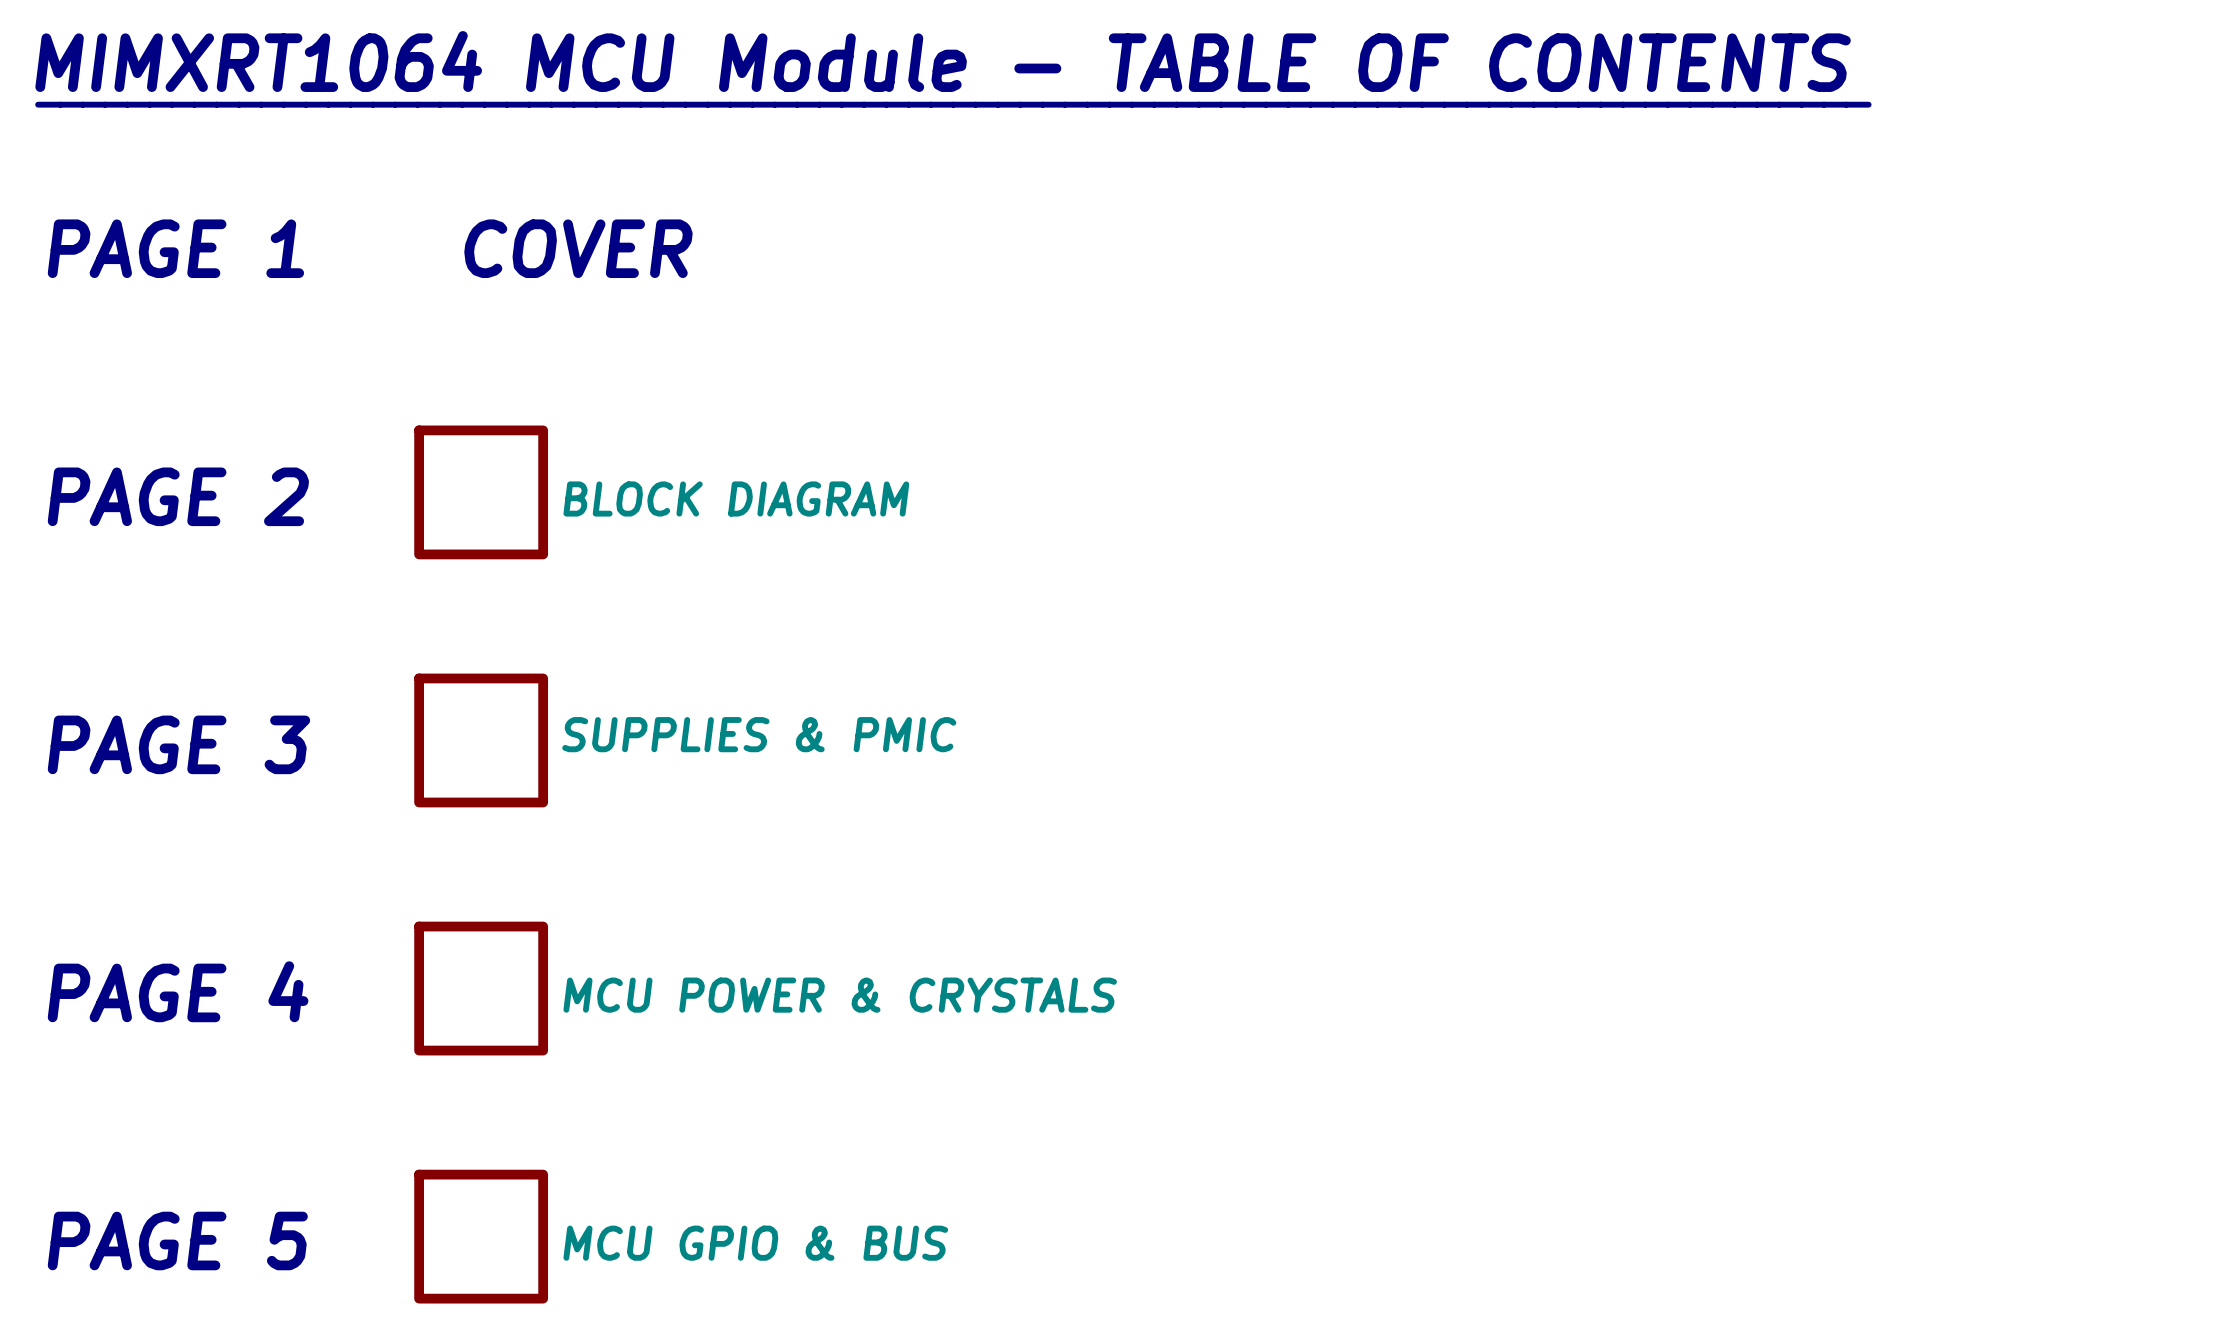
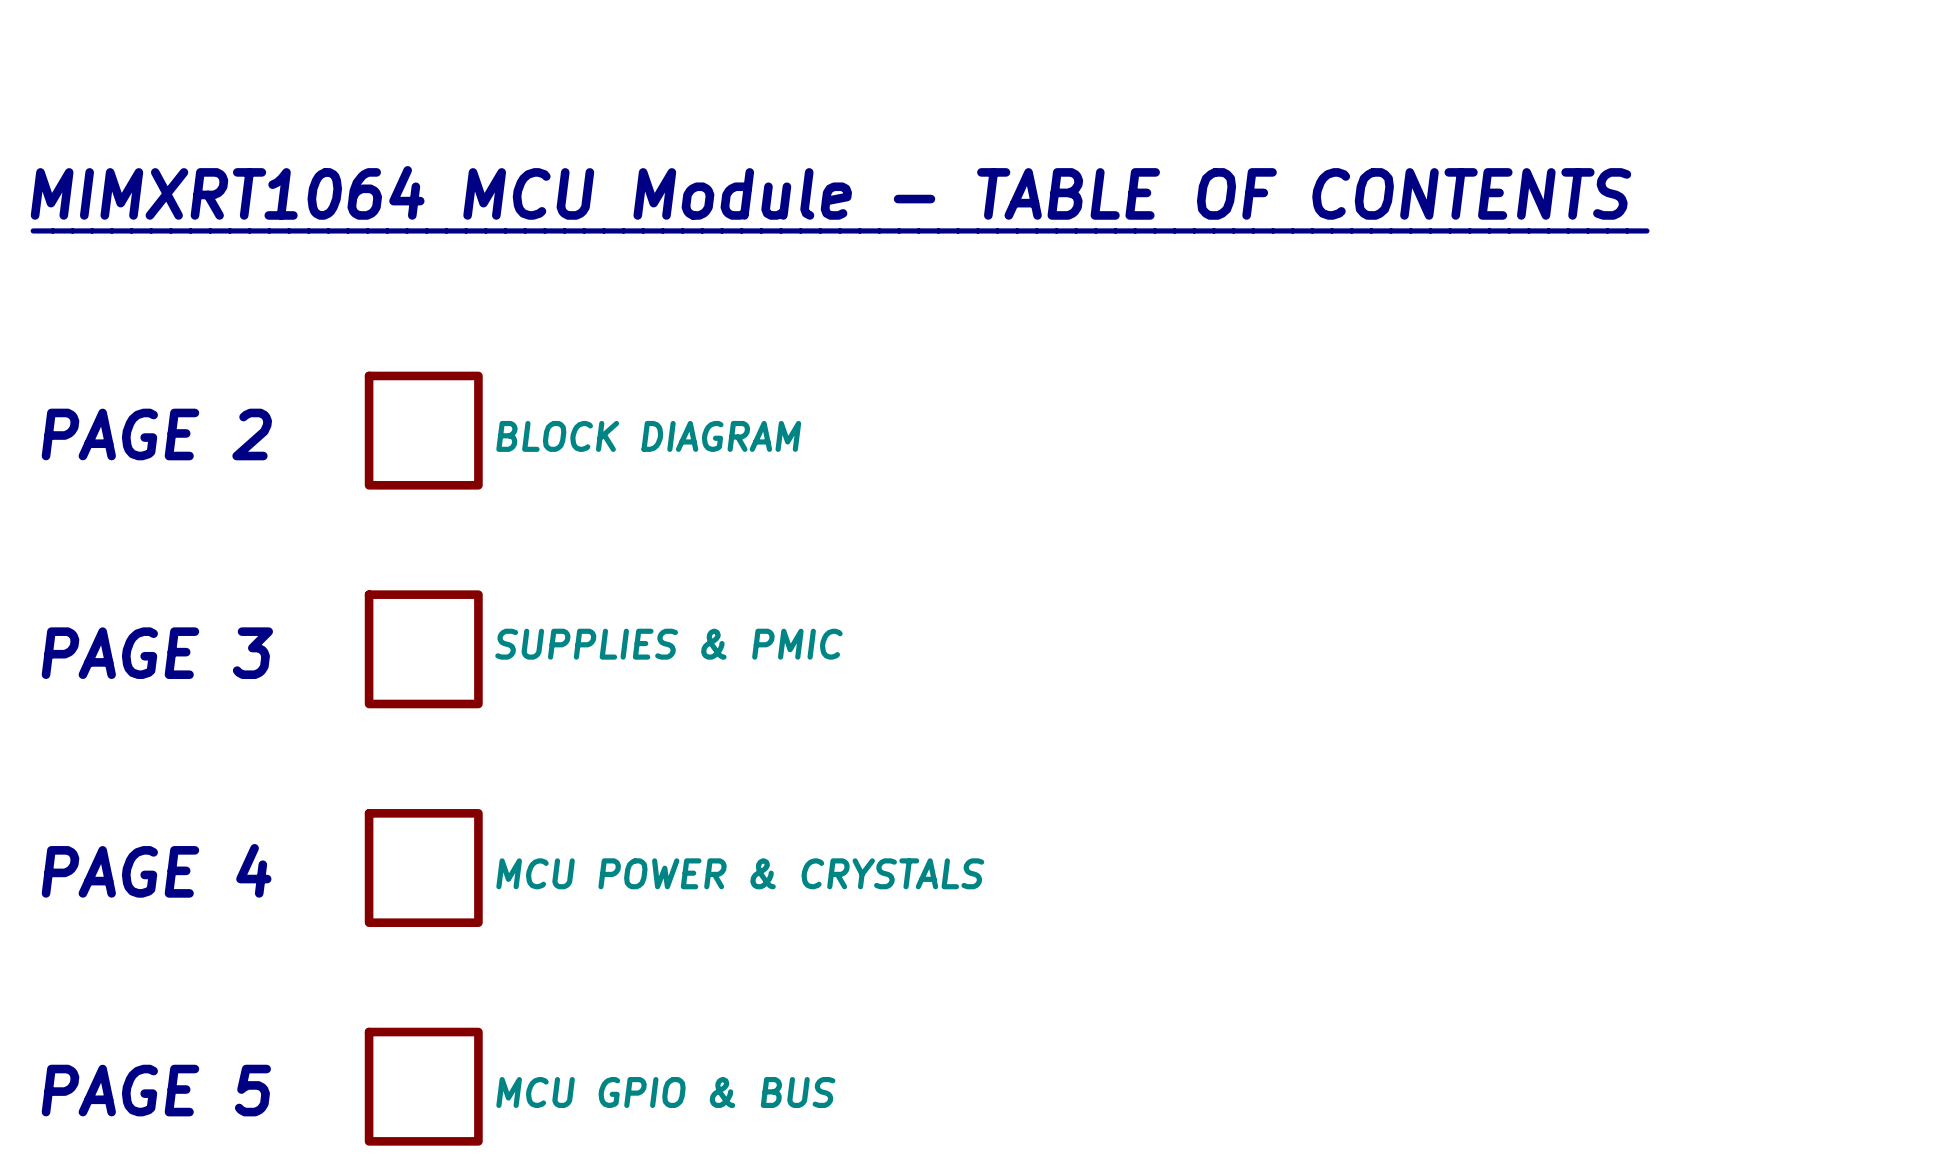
text position: MIMXRT1064 MCU Module - TABLE OF CONTENTS (943, 61) -> MIMXRT1064 MCU Module - TABLE OF CONTENTS (830, 192)
text position: __________________________________________________________________________________ (953, 104) -> __________________________________________________________________________________ (840, 230)
text: PAGE 1 COVER (370, 248) -> none

